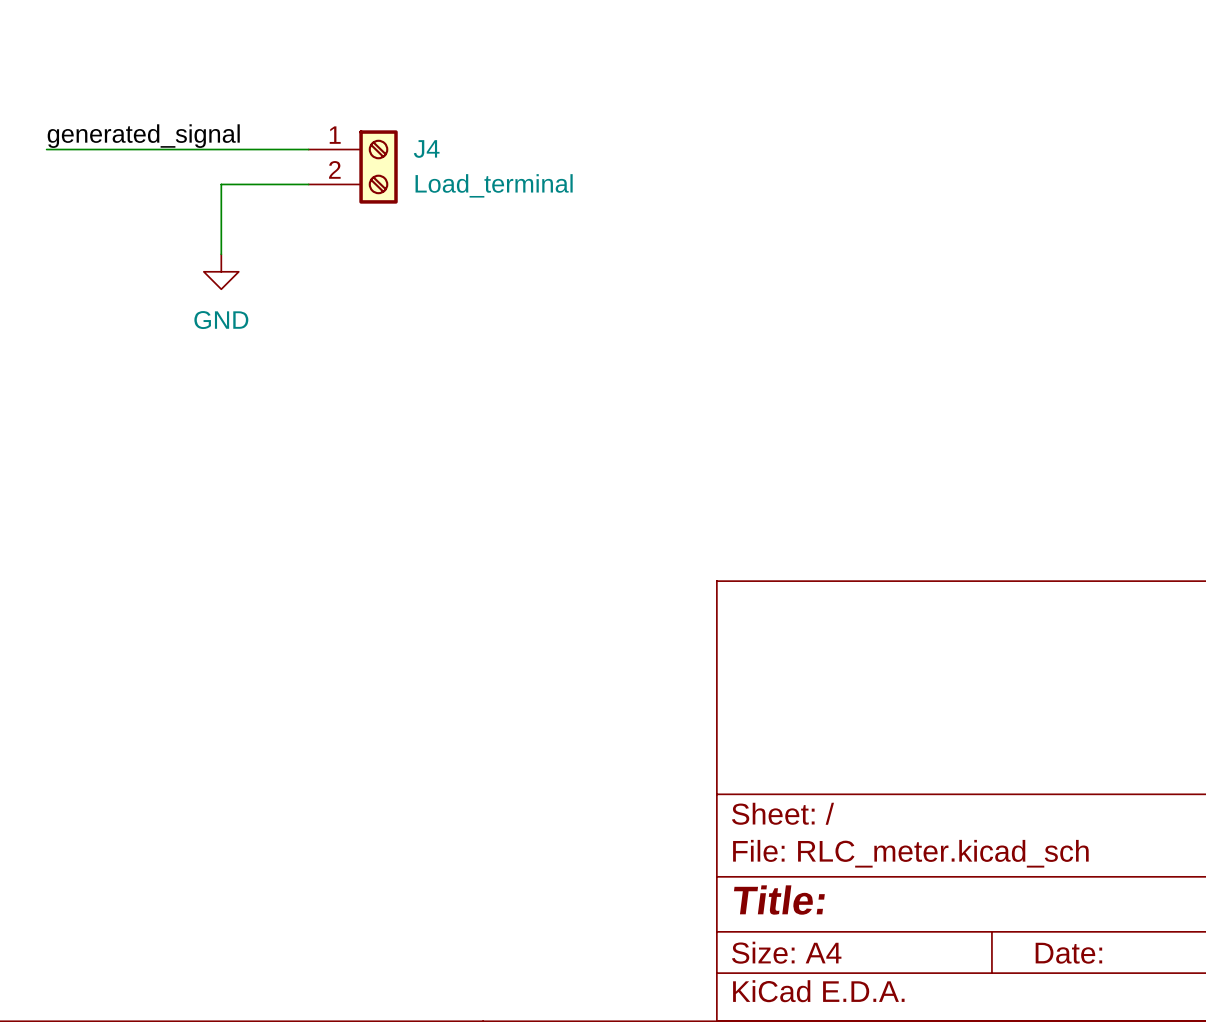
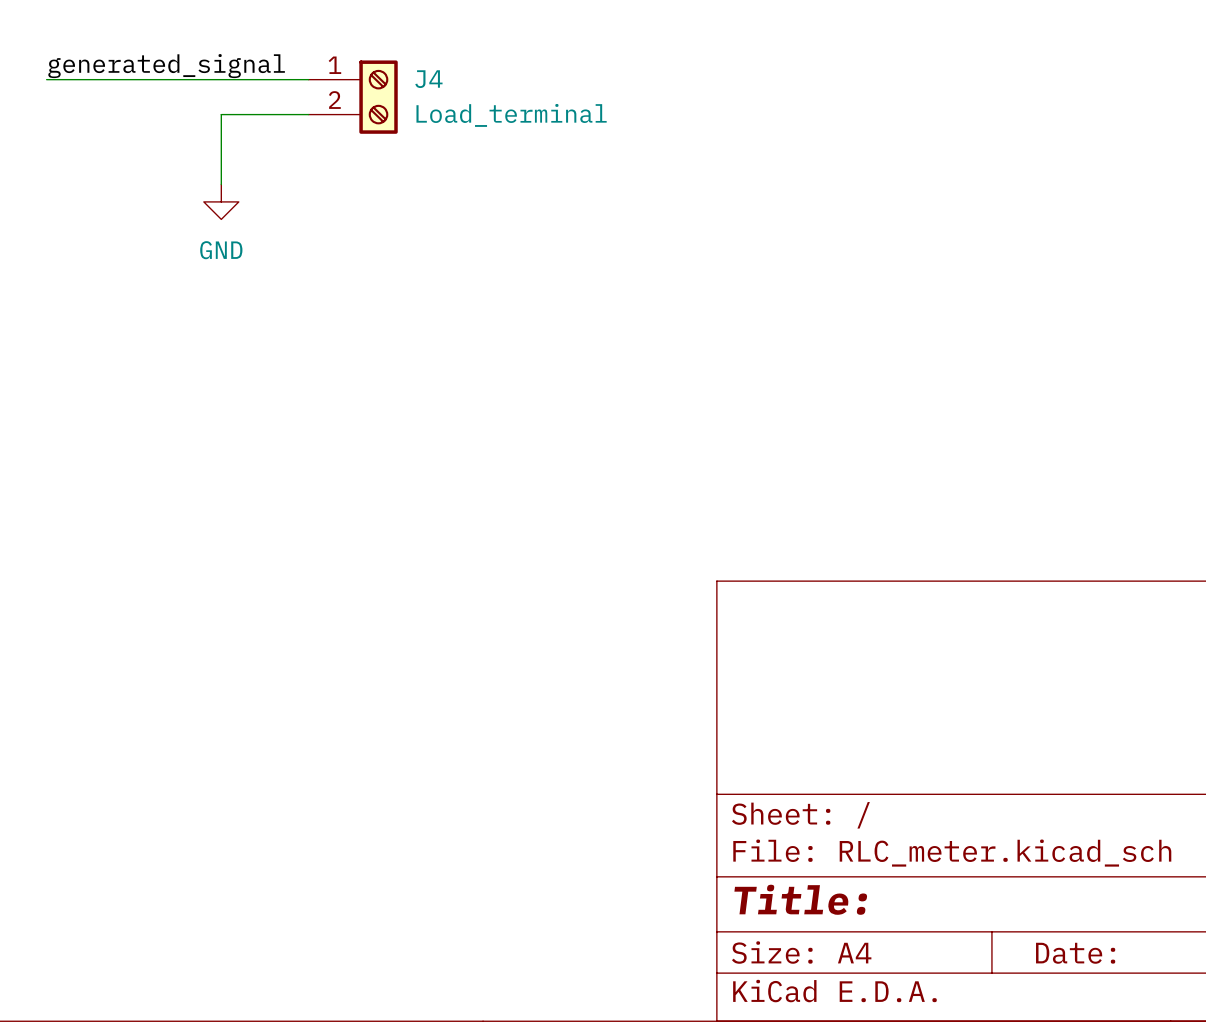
label position: generated_signal (143, 136) -> generated_signal (166, 66)
wire: (46, 149) (308, 149) -> (46, 79) (308, 79)
J4 position: (353, 166) -> (353, 97)
wire: (308, 184) (221, 184) (221, 254) -> (308, 114) (221, 114) (221, 184)
power symbol position: GND (221, 271) -> GND (221, 201)

